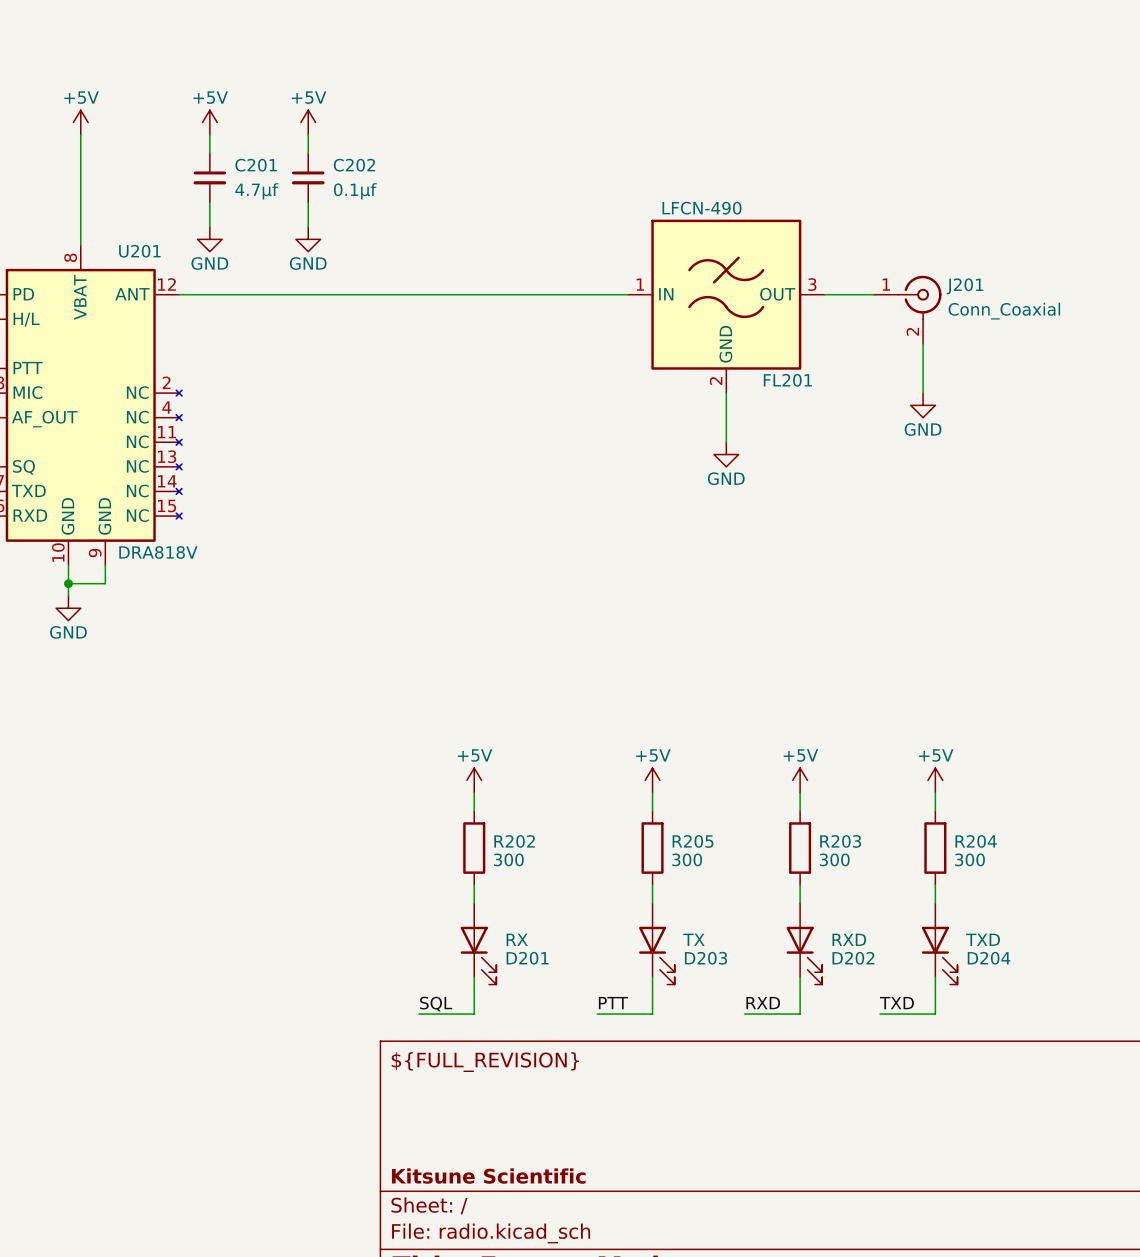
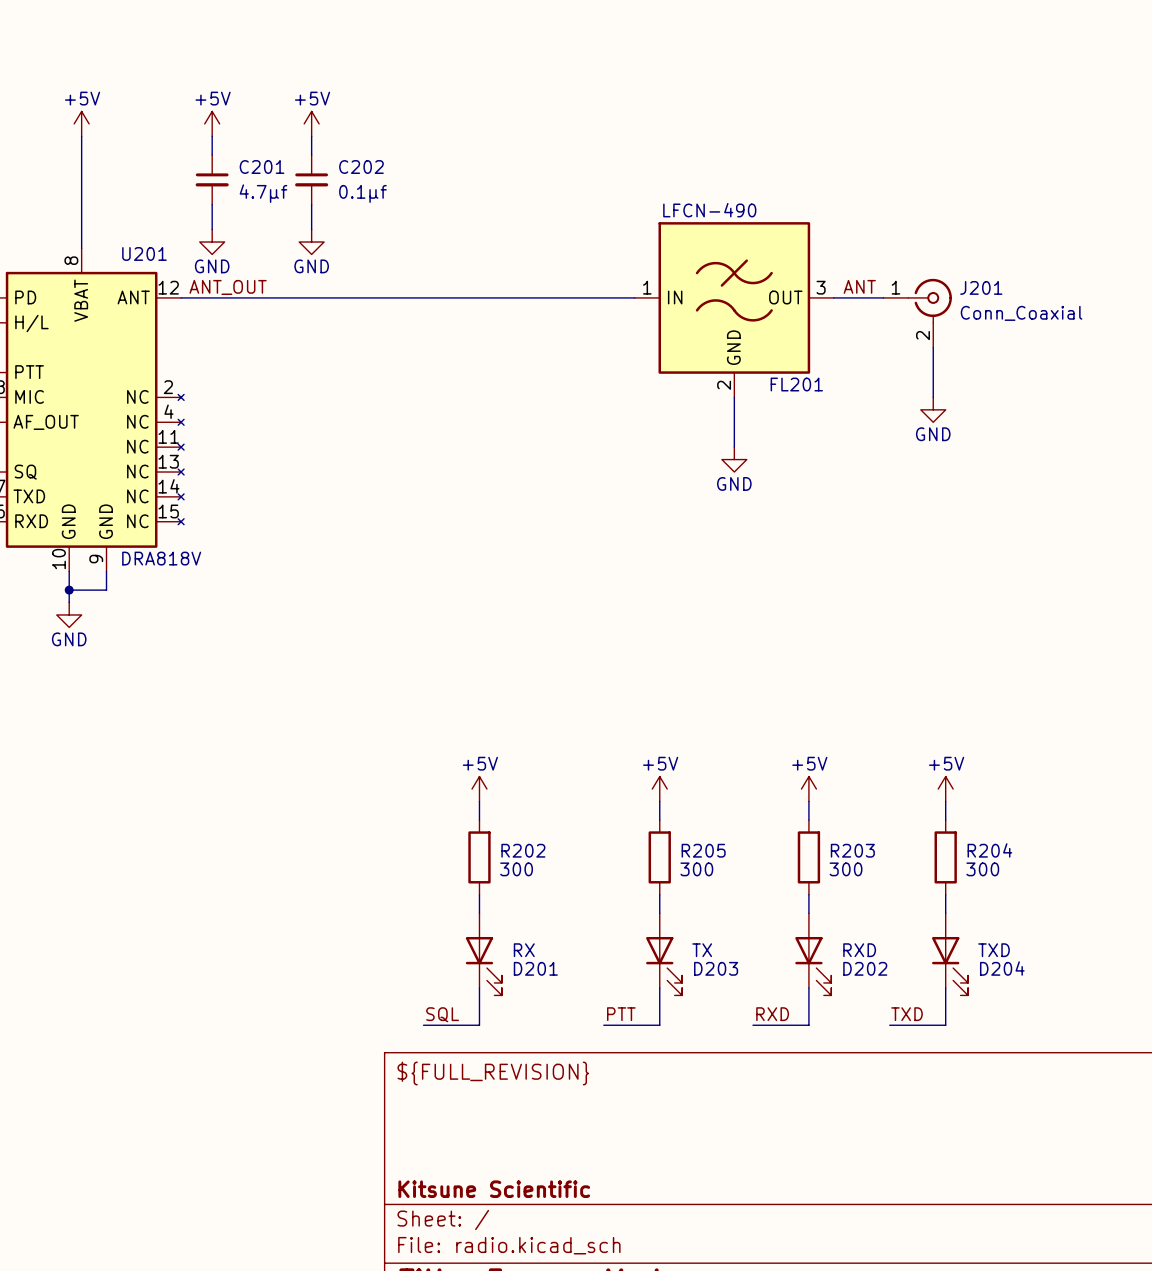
label: none -> ANT (859, 286)
label: none -> ANT_OUT (228, 287)

